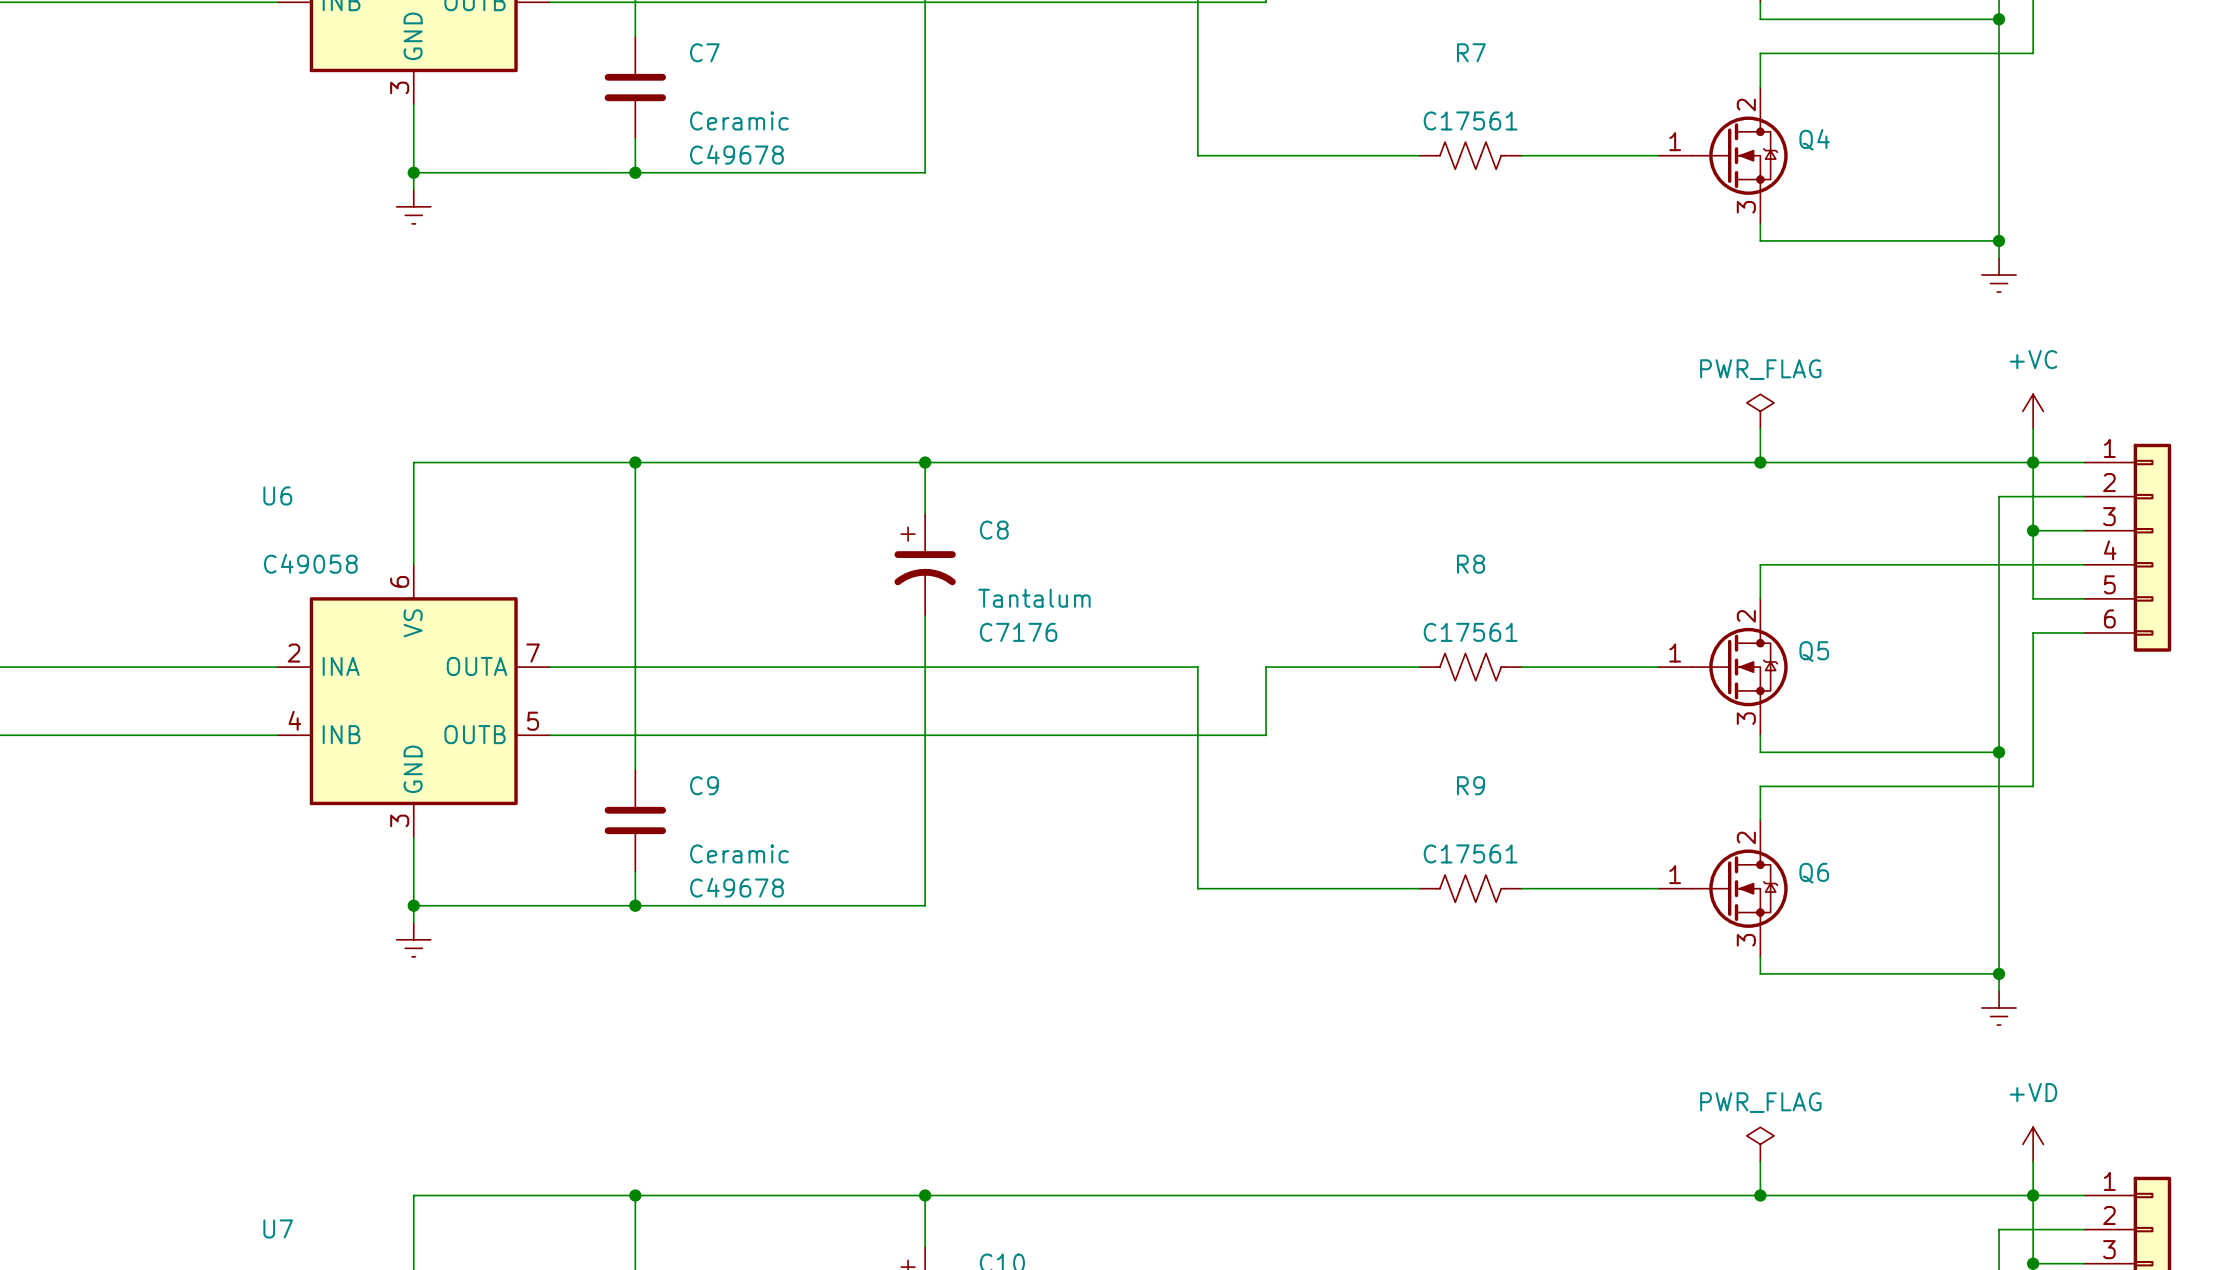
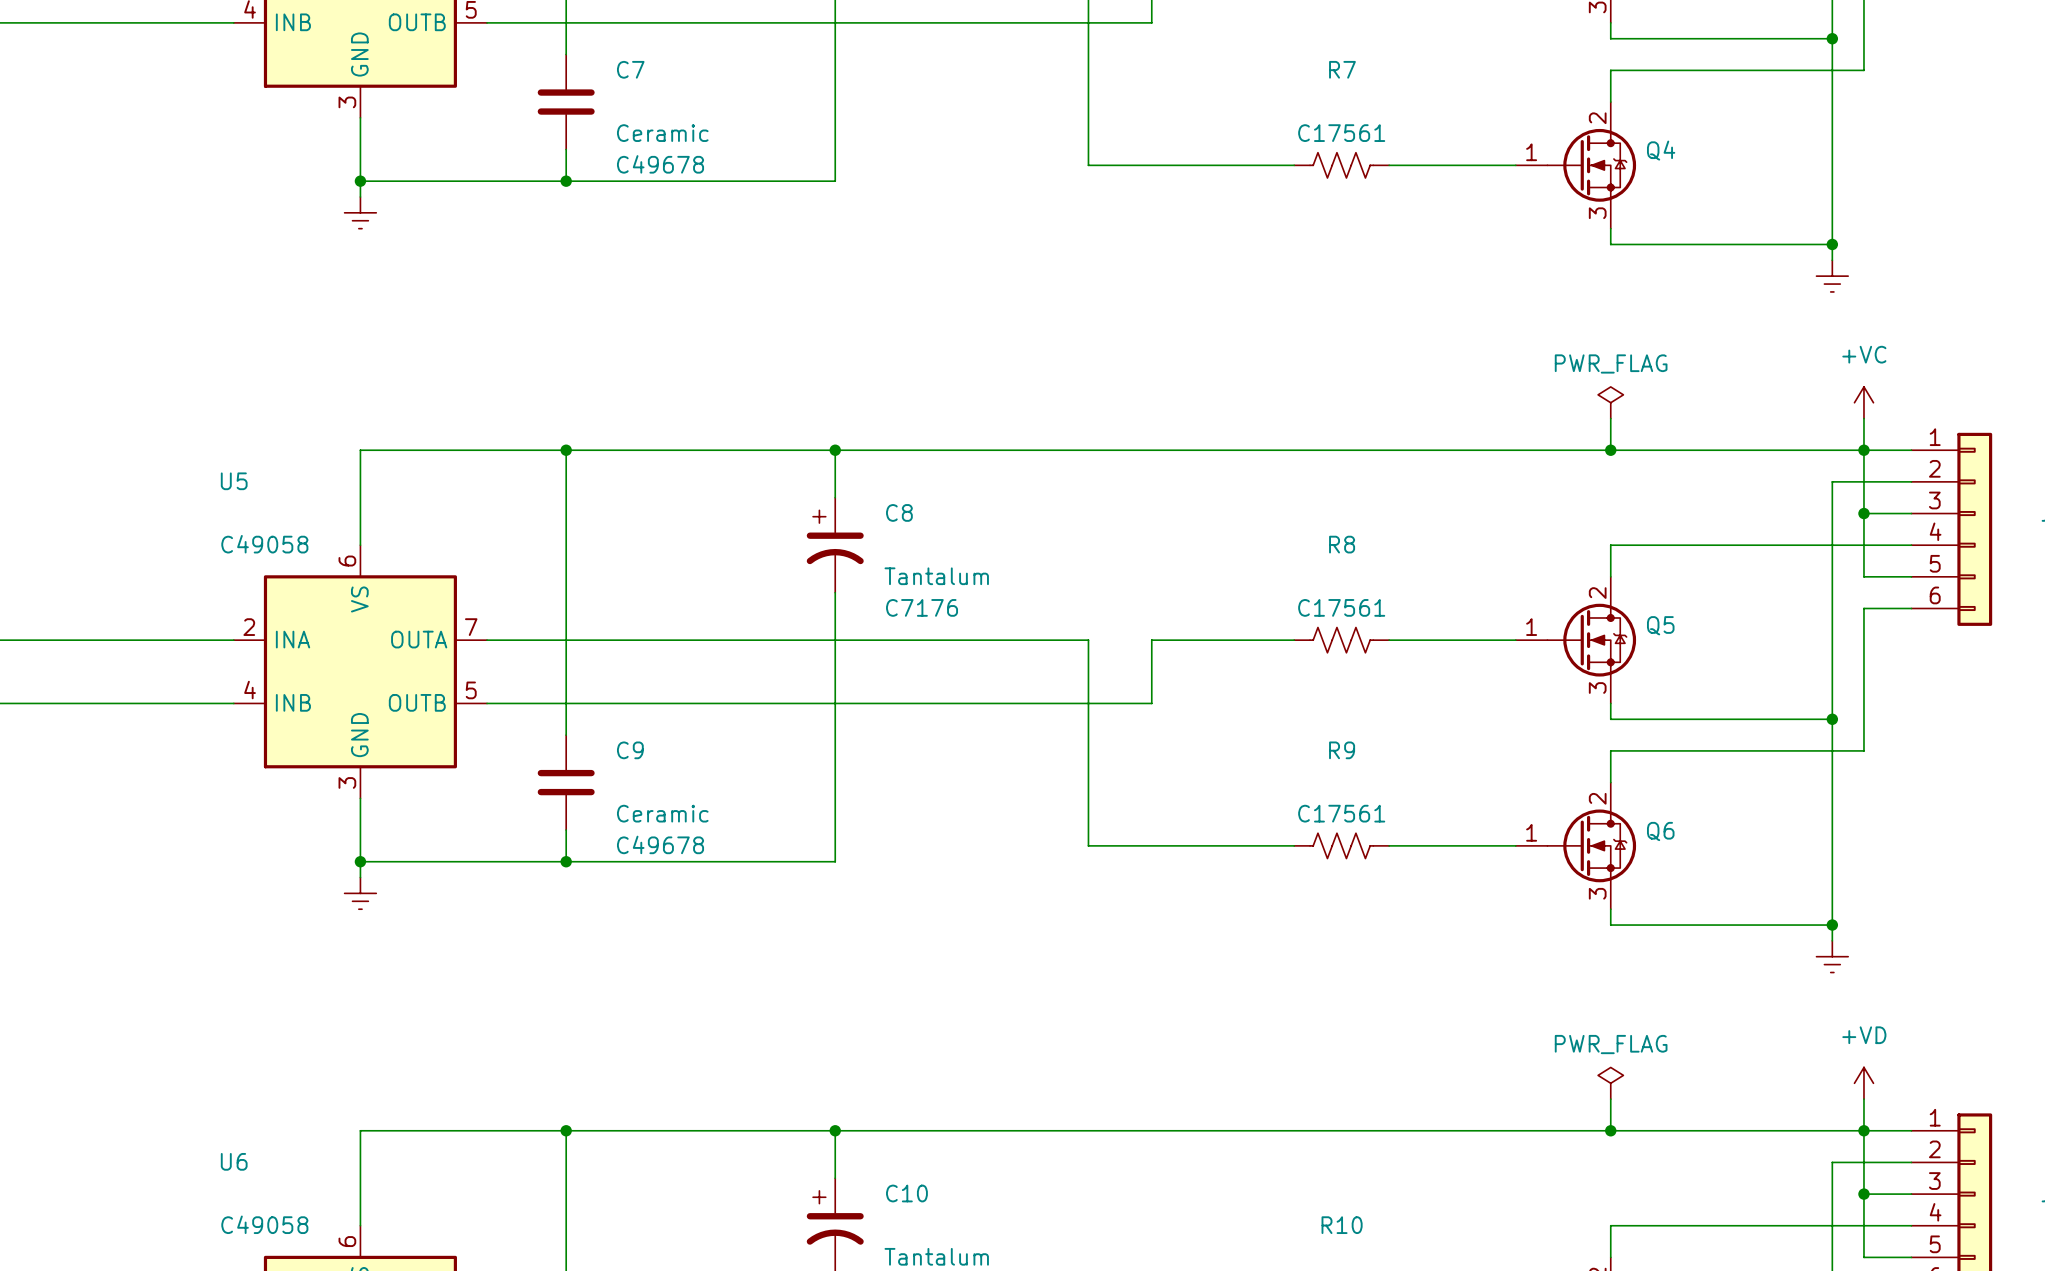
U6 name: U6 (277, 495) -> U5 (234, 481)
U7 name: U7 (278, 1228) -> U6 (234, 1161)

